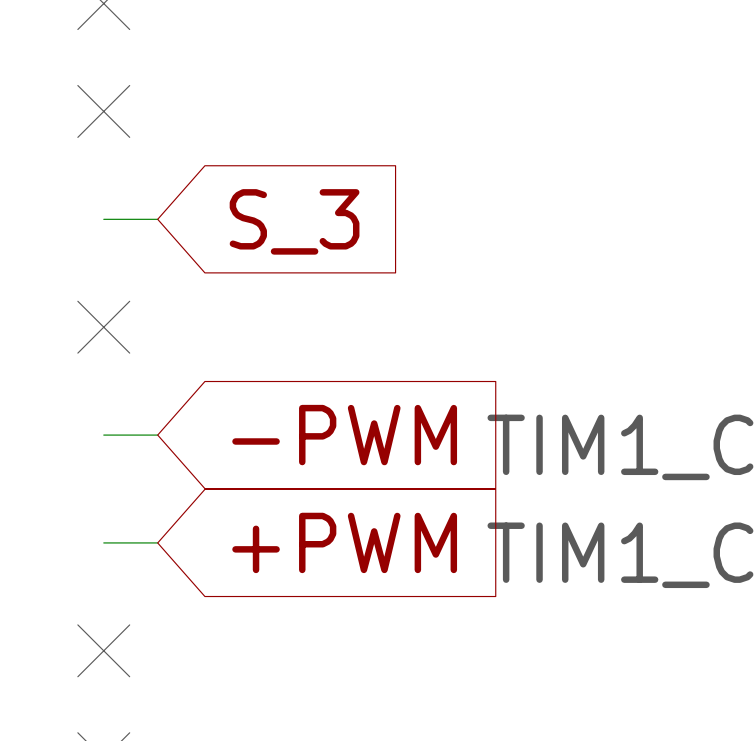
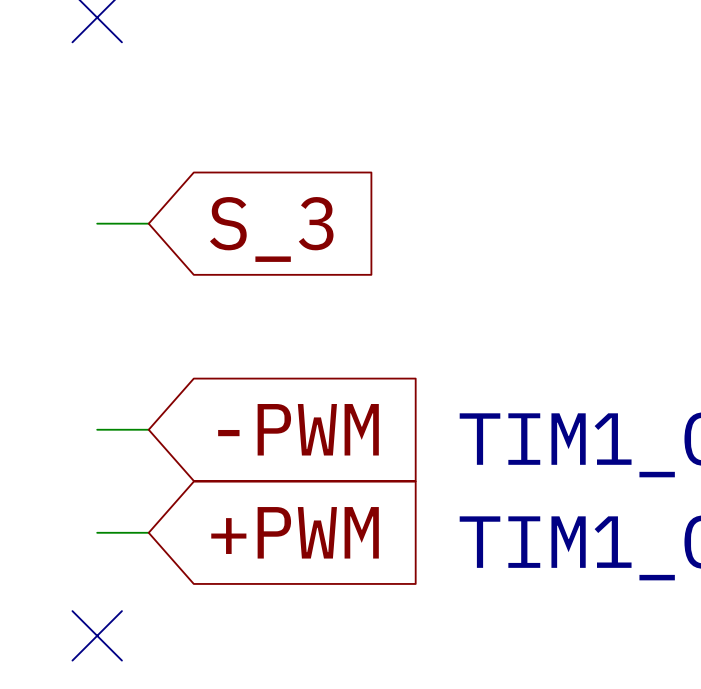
no-connect mark: (103, 111) -> none
no-connect mark: (103, 327) -> none

